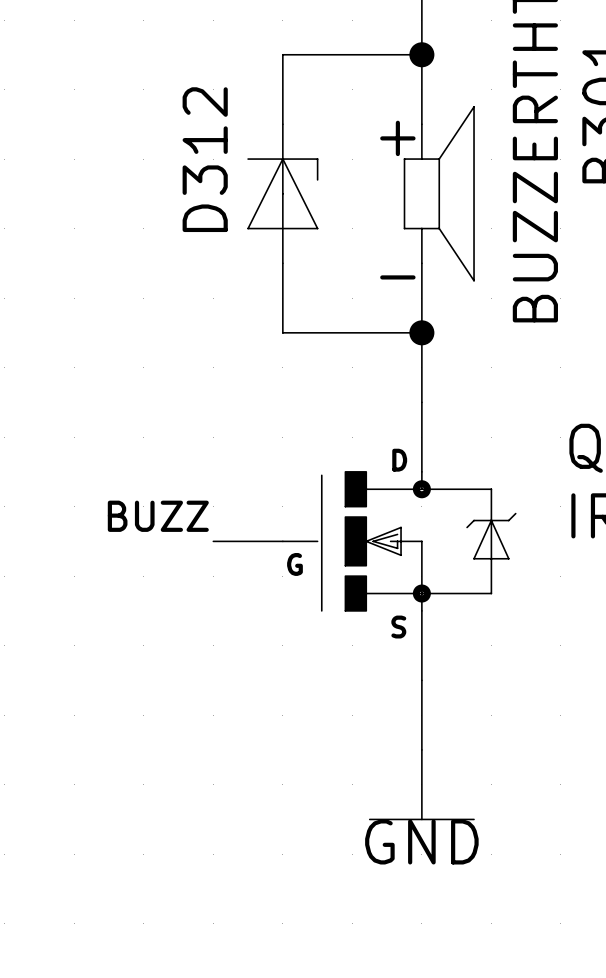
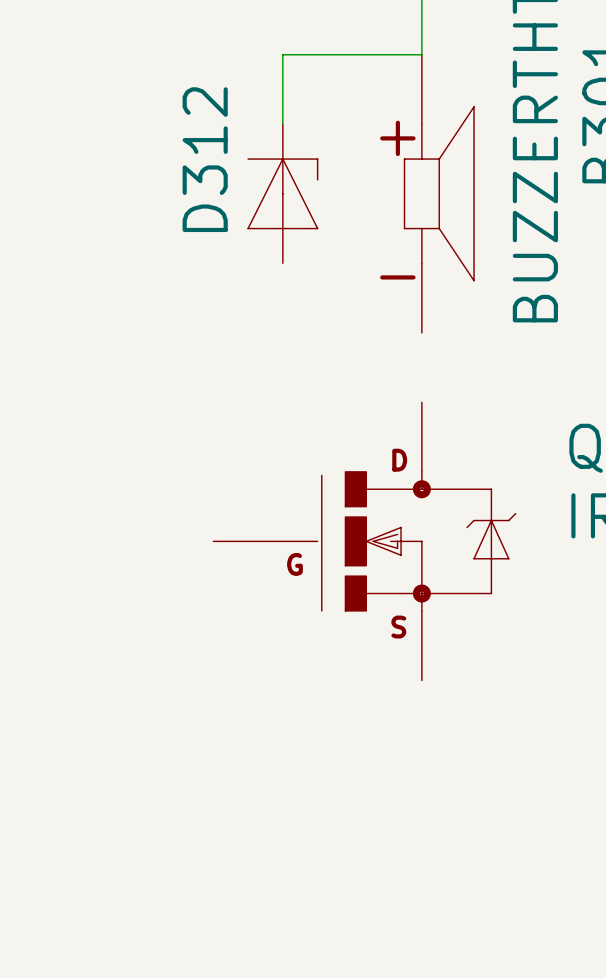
junction: (421, 54) -> none
wire: (282, 263) (282, 332) (421, 332) (421, 402) -> none
junction: (421, 332) -> none
label: BUZZ (158, 516) -> none
wire: (421, 680) (421, 749) -> none
power symbol: GND (421, 784) -> none

